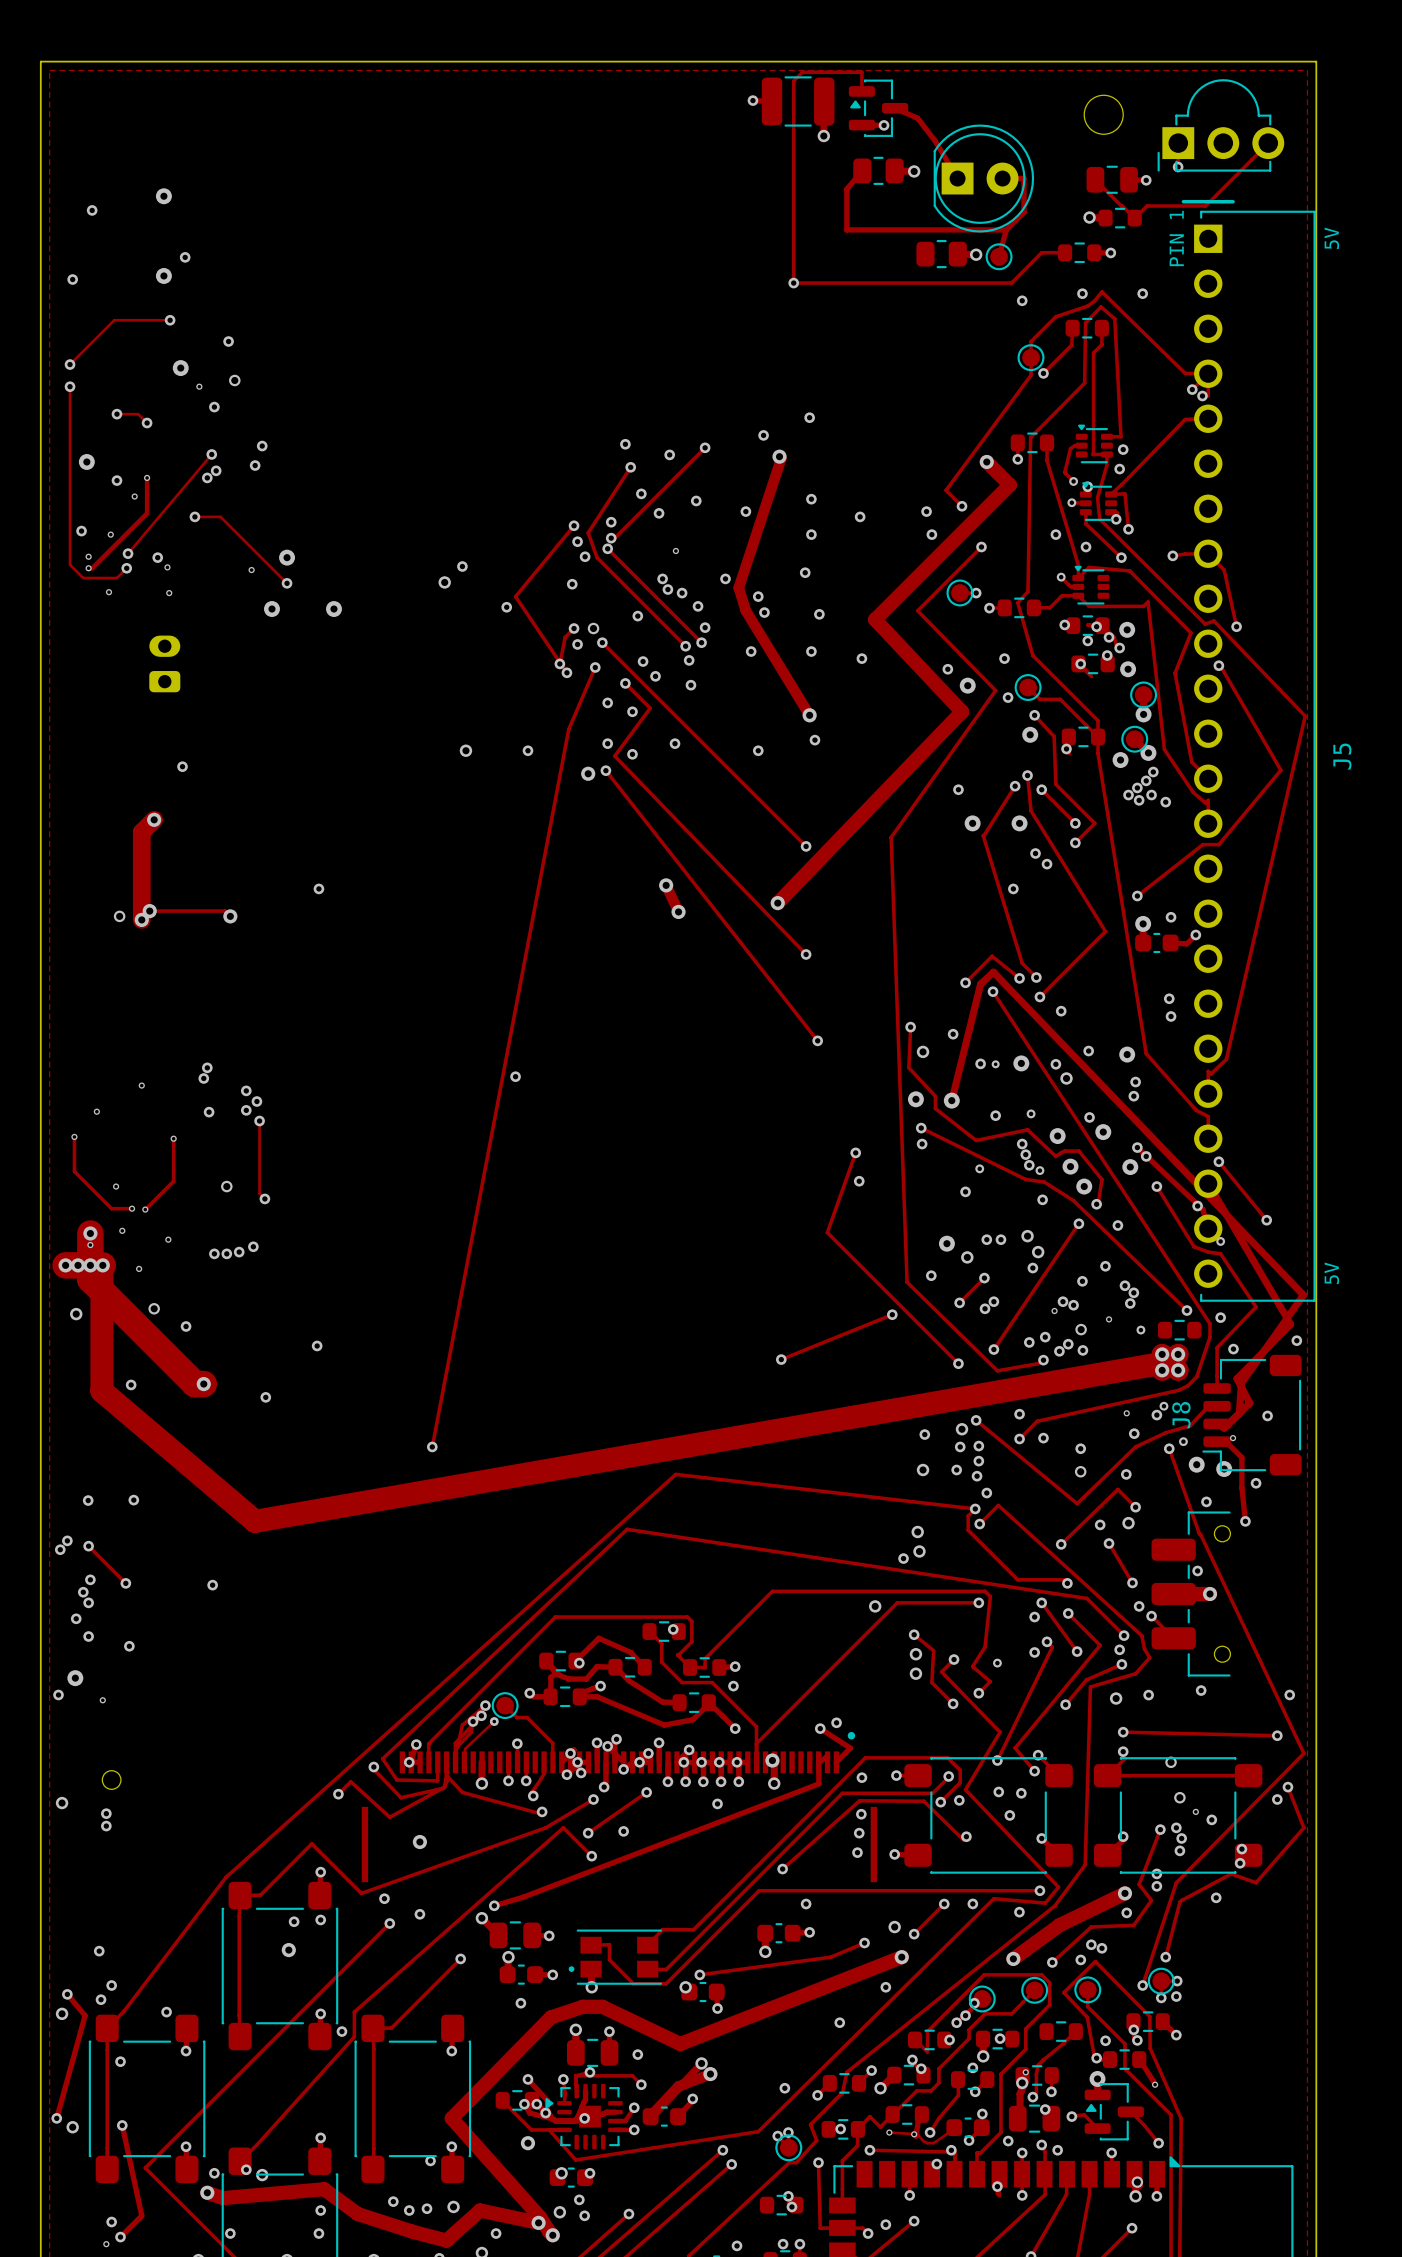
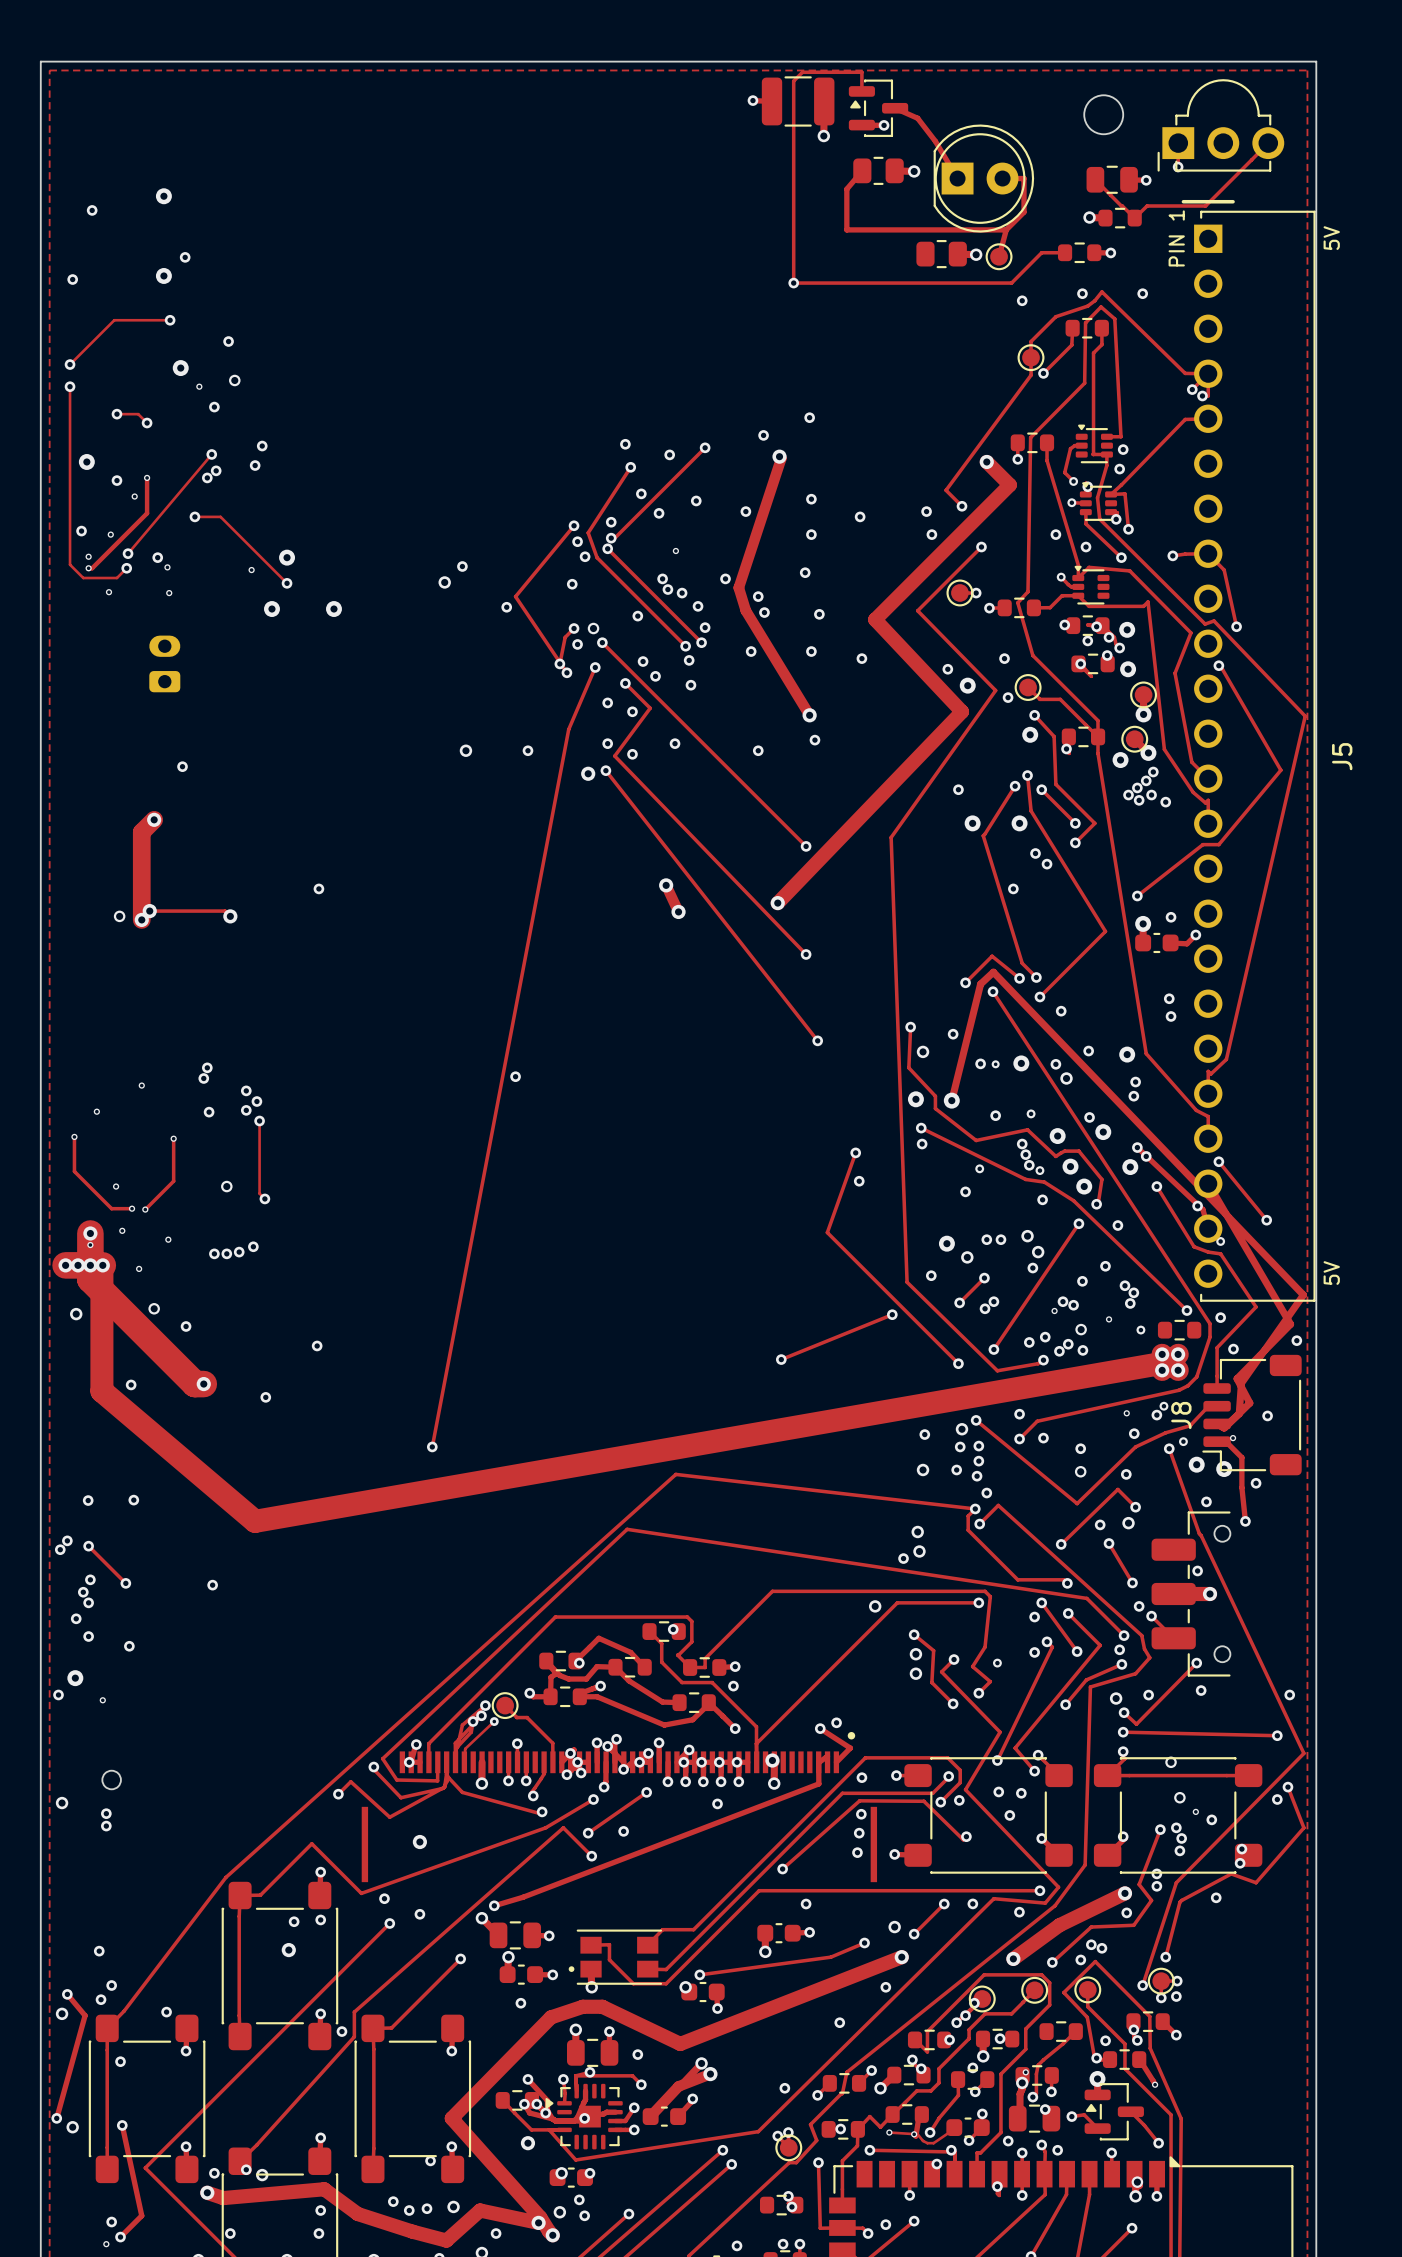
track: none -> (1196, 1663) (1136, 1724) (1124, 1712)
via: none -> (1196, 1663)
via: none -> (1124, 1712)

